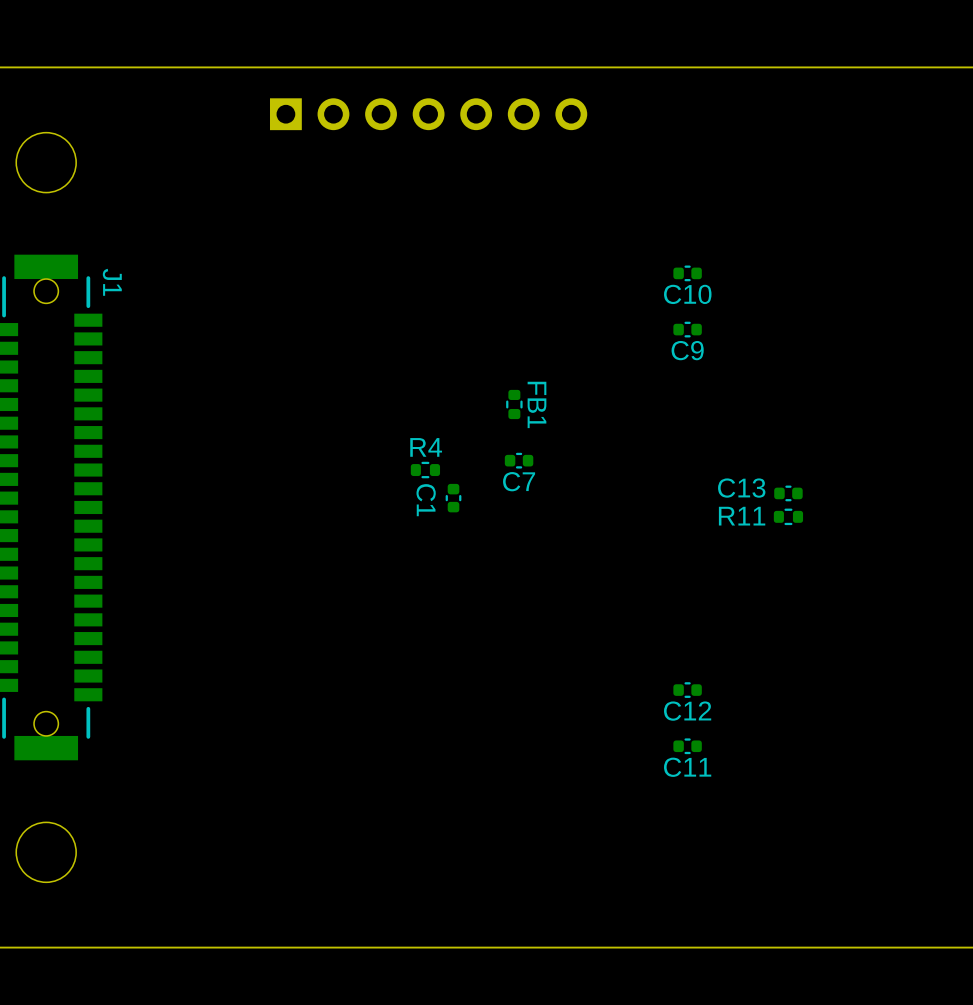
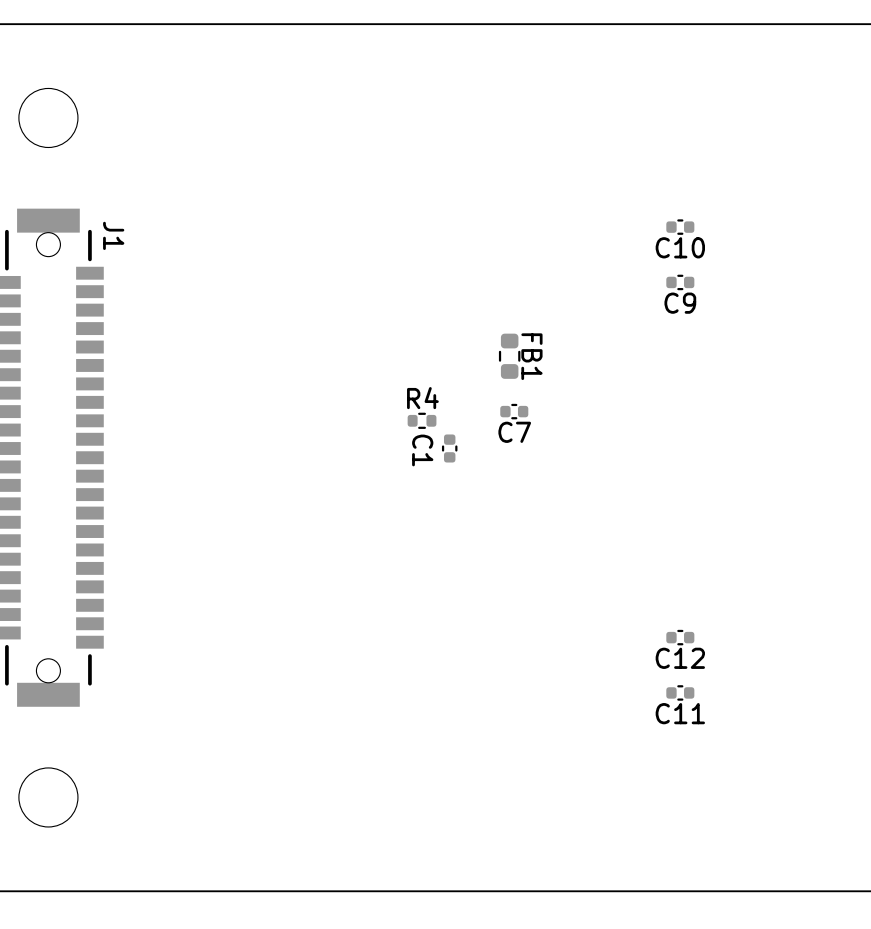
part: (428, 114) -> none
FB1 footprint: [506, 389, 523, 420] -> [498, 333, 521, 379]
C13: (788, 493) -> none
R11: (788, 516) -> none

